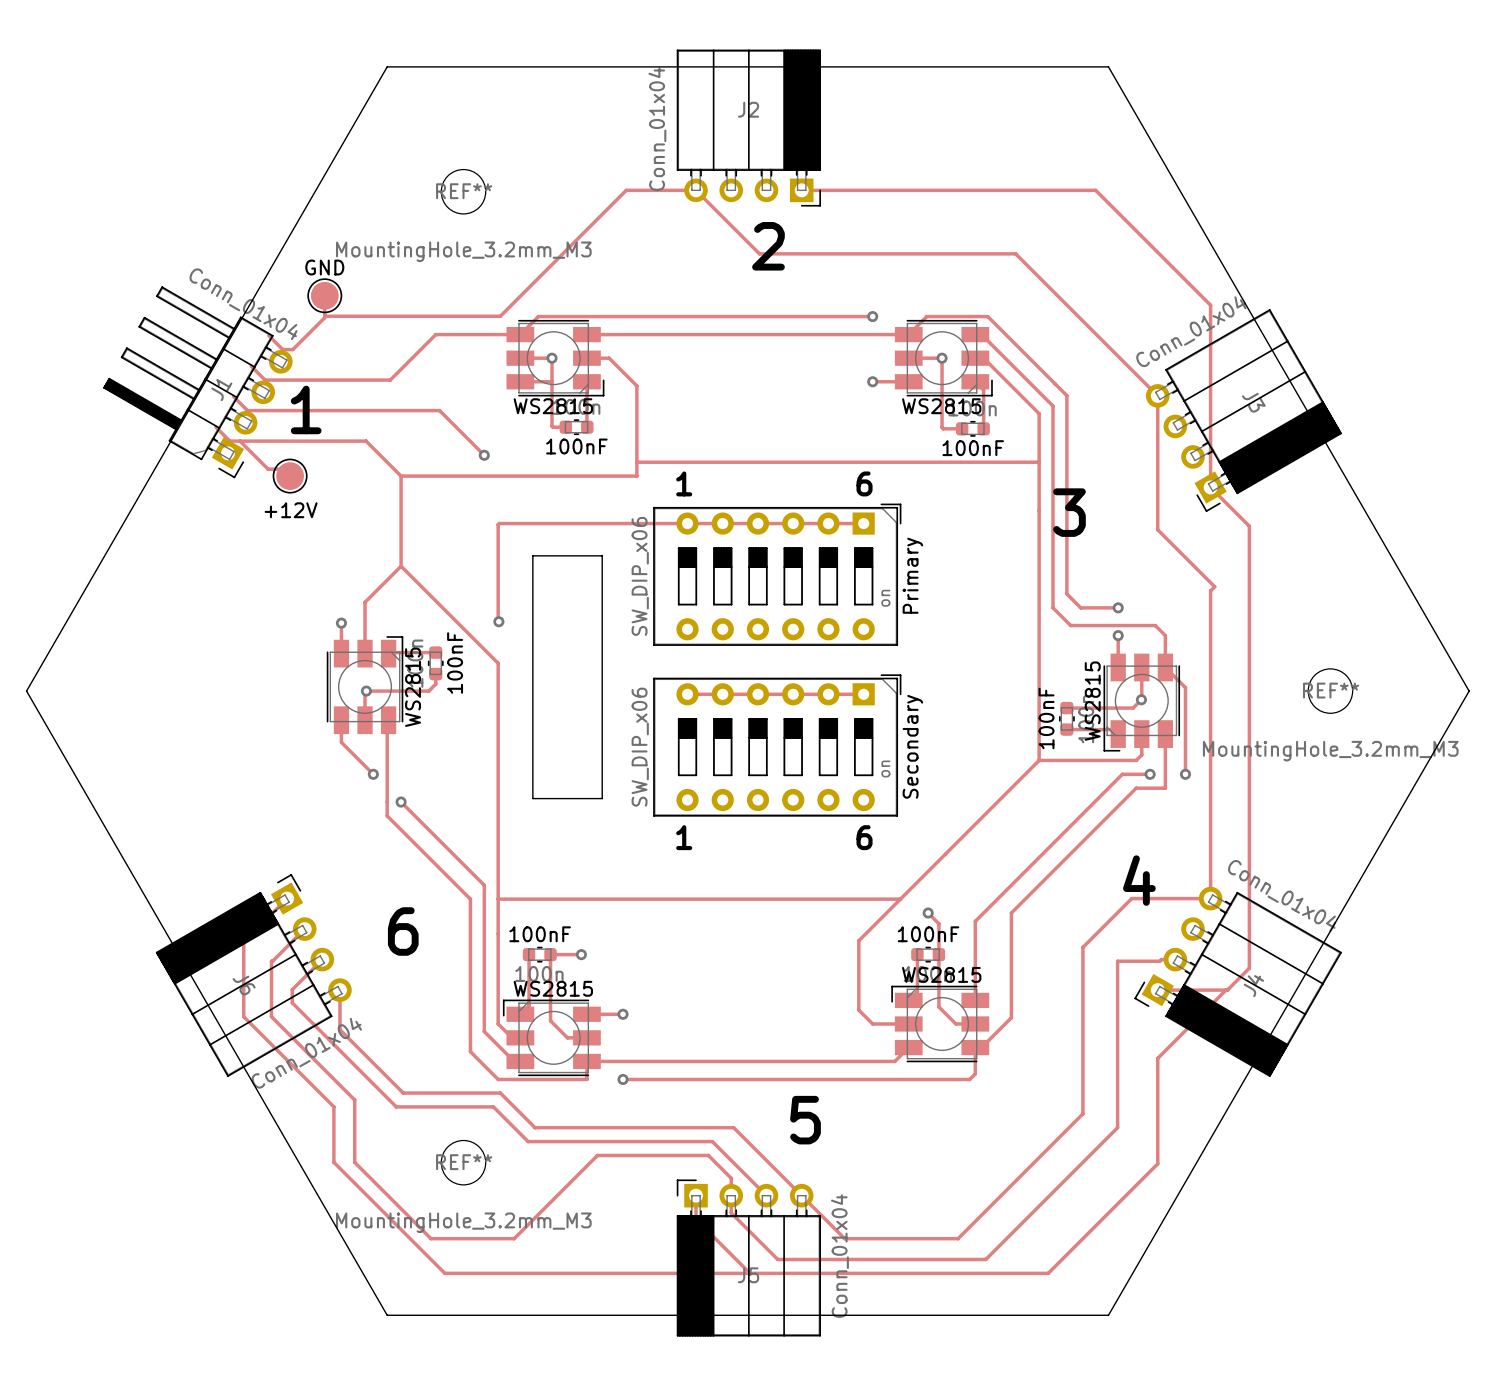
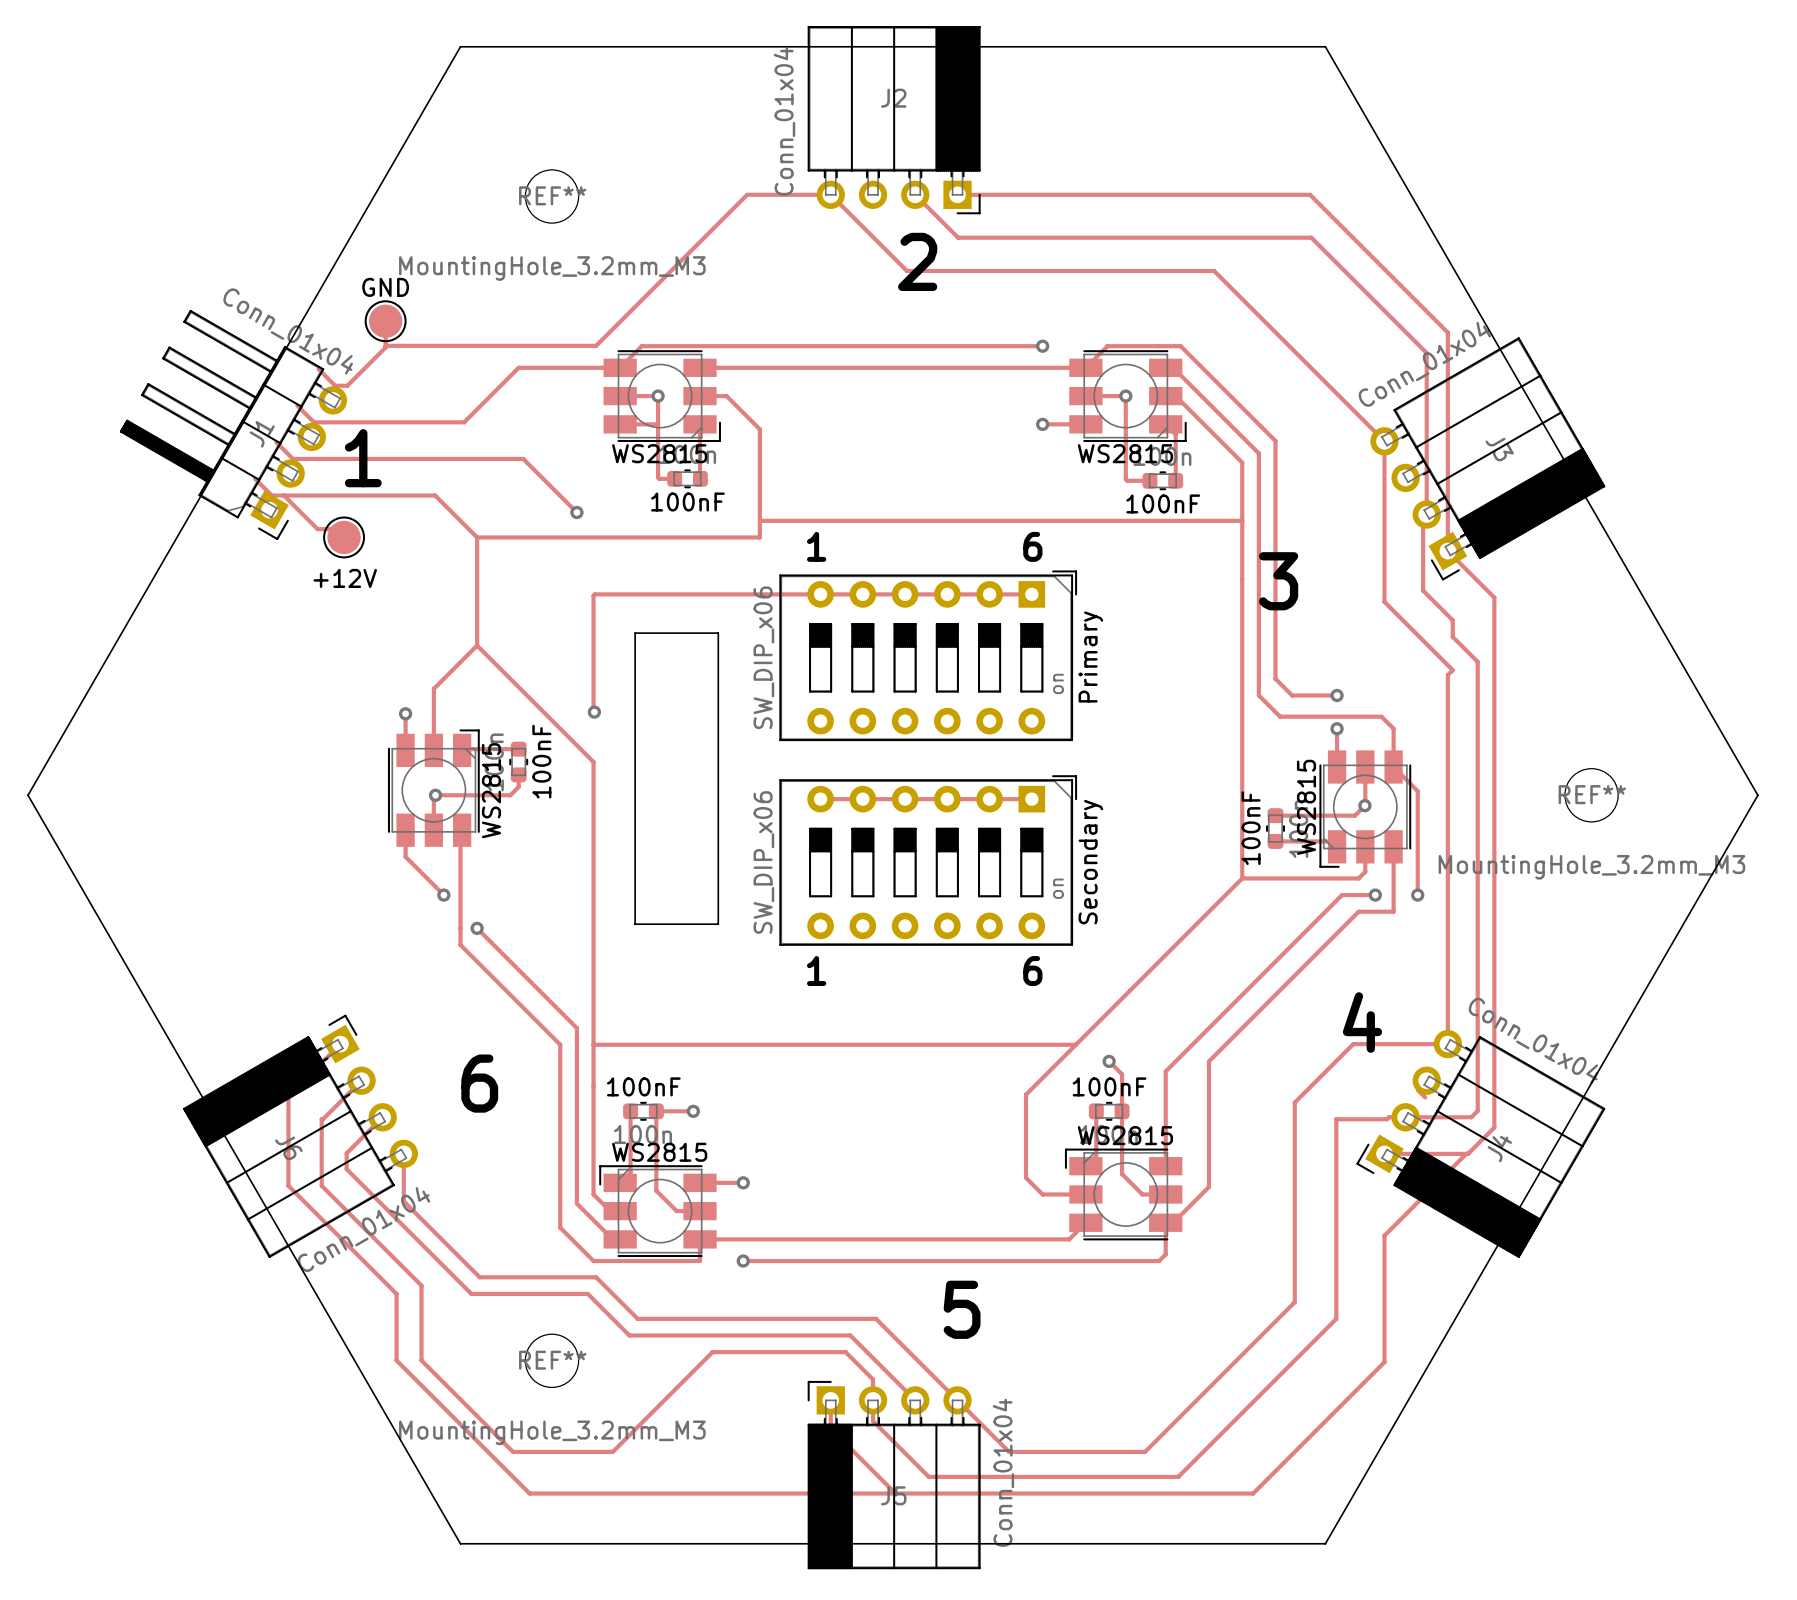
track: none -> (915, 194) (958, 237) (1311, 237) (1426, 353) (1426, 514)
track: none -> (1423, 518) (1423, 590) (1452, 620) (1452, 636) (1477, 661) (1477, 1110) (1471, 1117) (1405, 1117)
track: none -> (1418, 1090) (1425, 1097)

